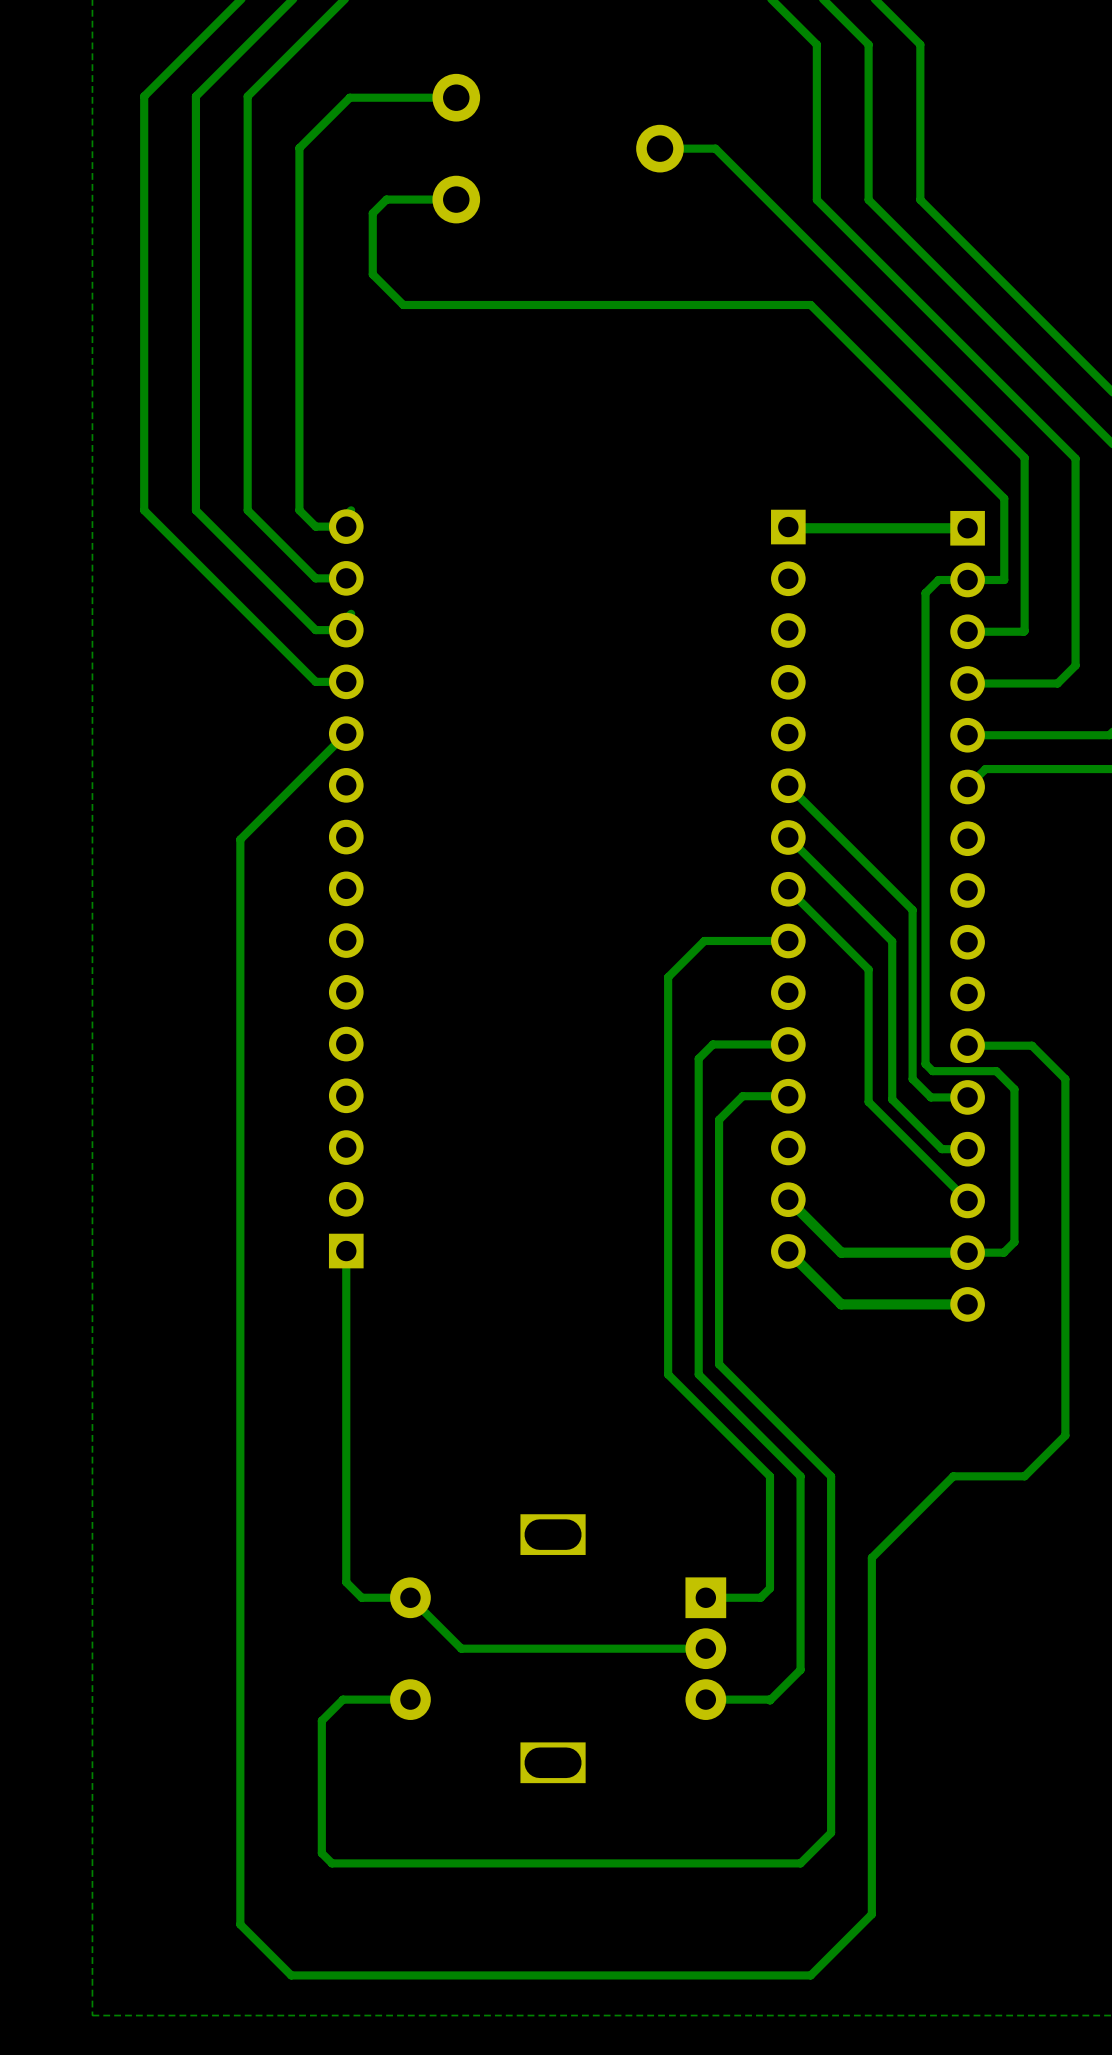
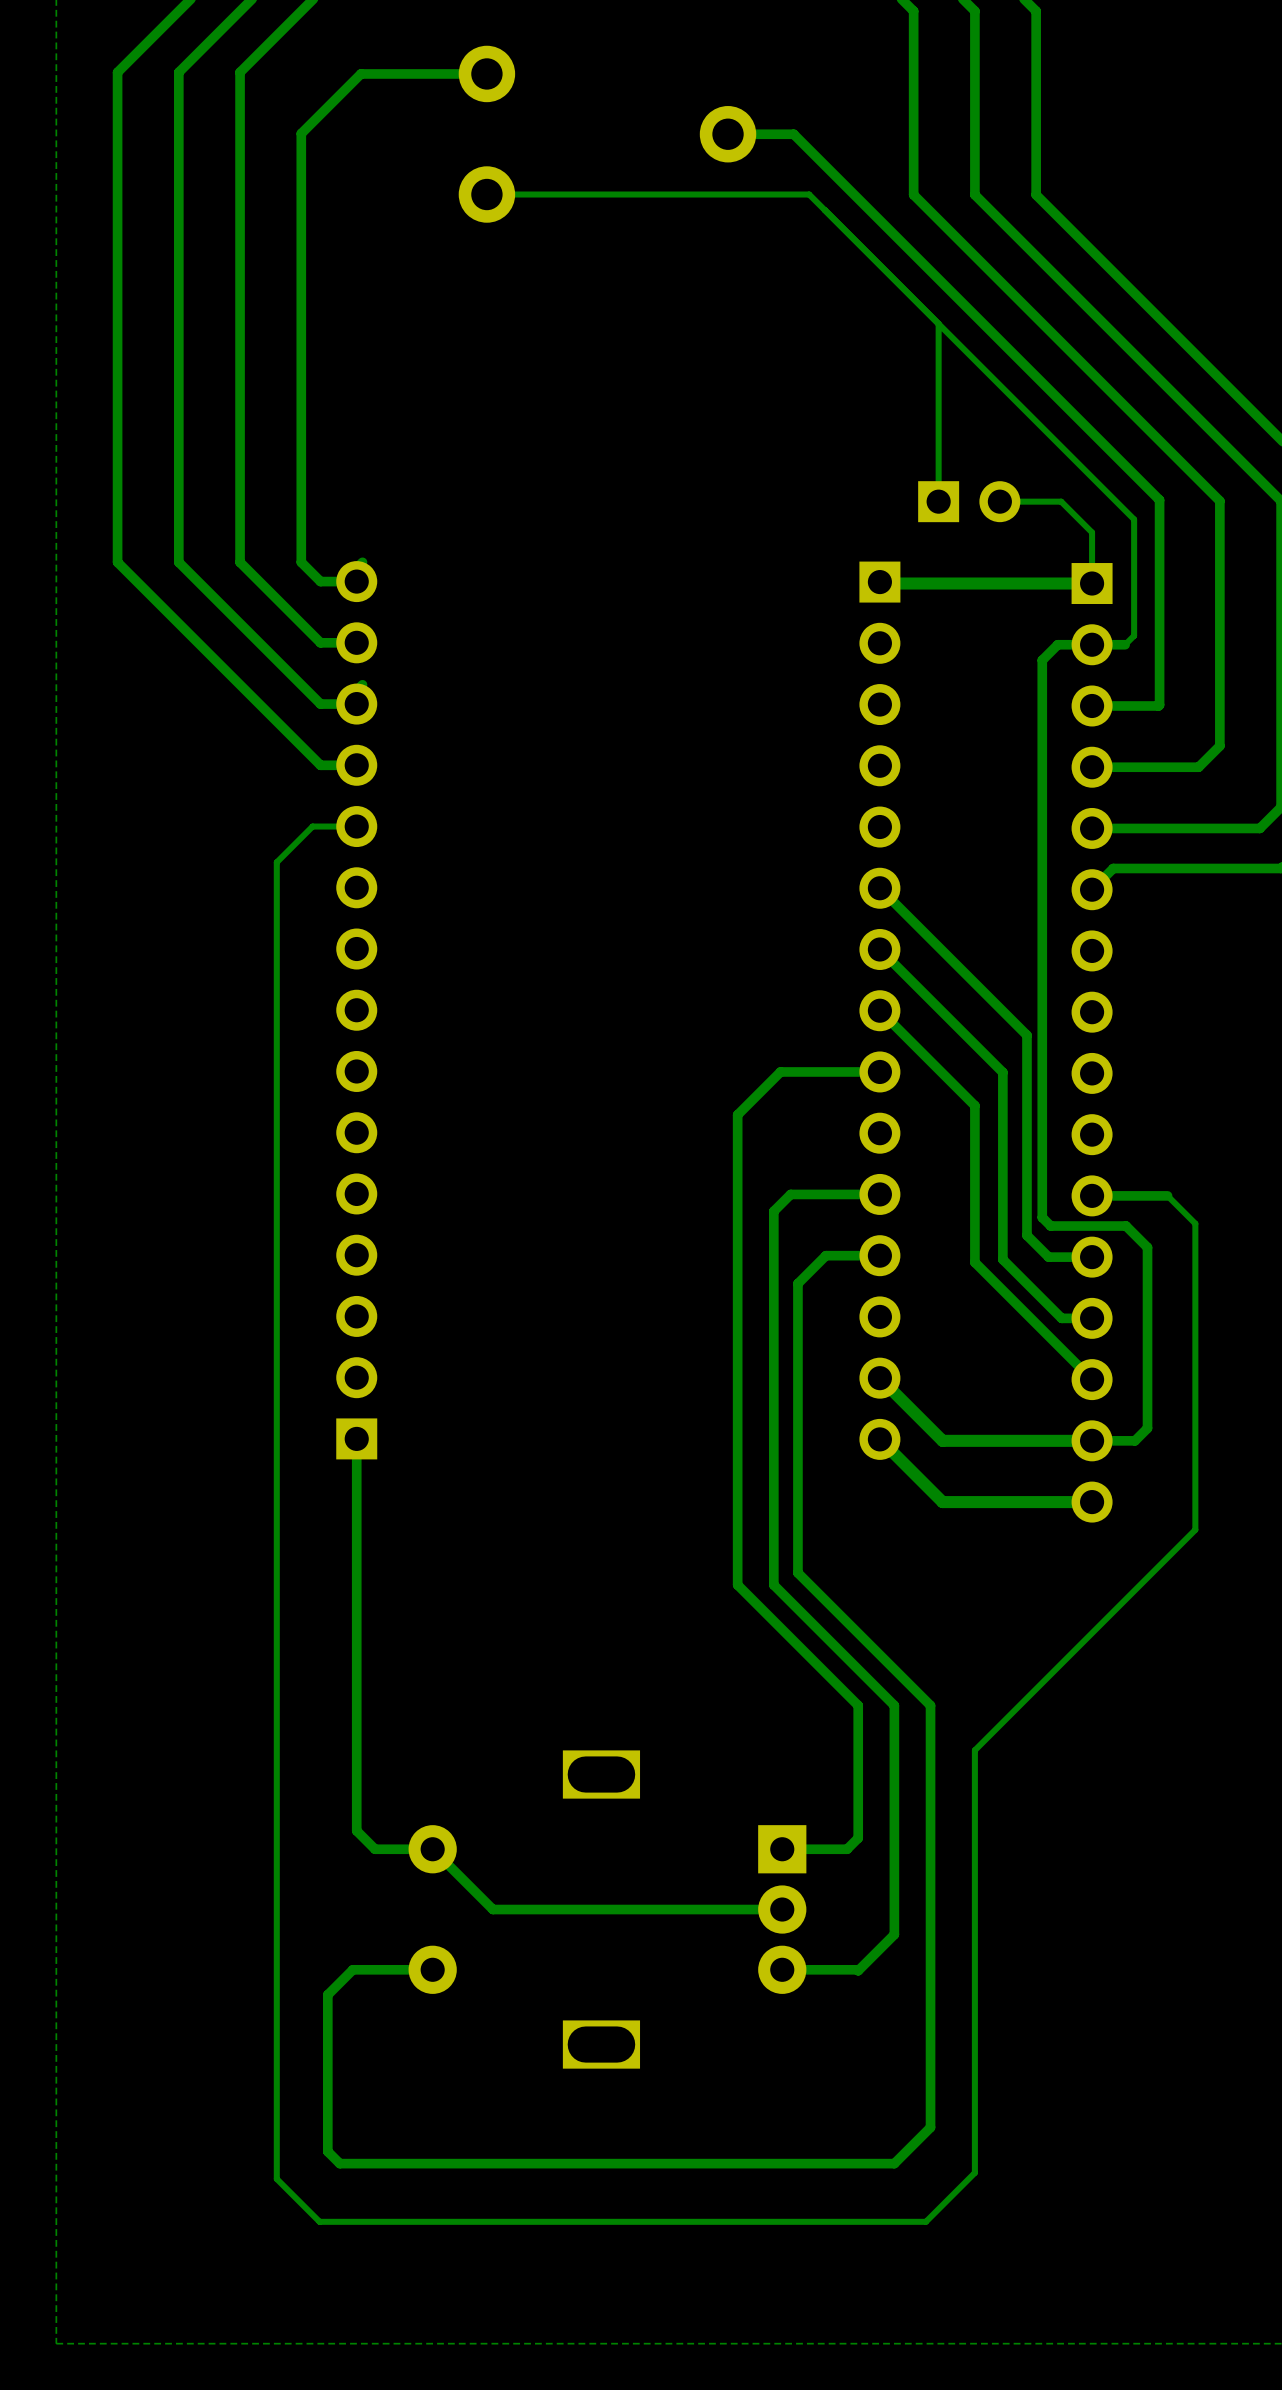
track: (456, 199) (386, 199) (372, 213) (372, 274) (403, 304) (810, 304) (1004, 498) (1004, 580) (995, 580) -> (486, 194) (809, 194) (1134, 519) (1134, 635) (1125, 644)
track: none -> (938, 323) (938, 501)
part: none -> (969, 501)
track: none -> (999, 501) (1061, 501) (1092, 532) (1092, 583)
track: (346, 733) (240, 839) (240, 1924) (291, 1975) (810, 1975) (871, 1914) (871, 1557) (953, 1476) (1024, 1476) (1065, 1435) (1065, 1079) (1031, 1045) -> (356, 826) (312, 826) (276, 862) (276, 2178) (319, 2221) (925, 2221) (974, 2172) (974, 1750) (1195, 1529) (1195, 1223) (1167, 1195)

